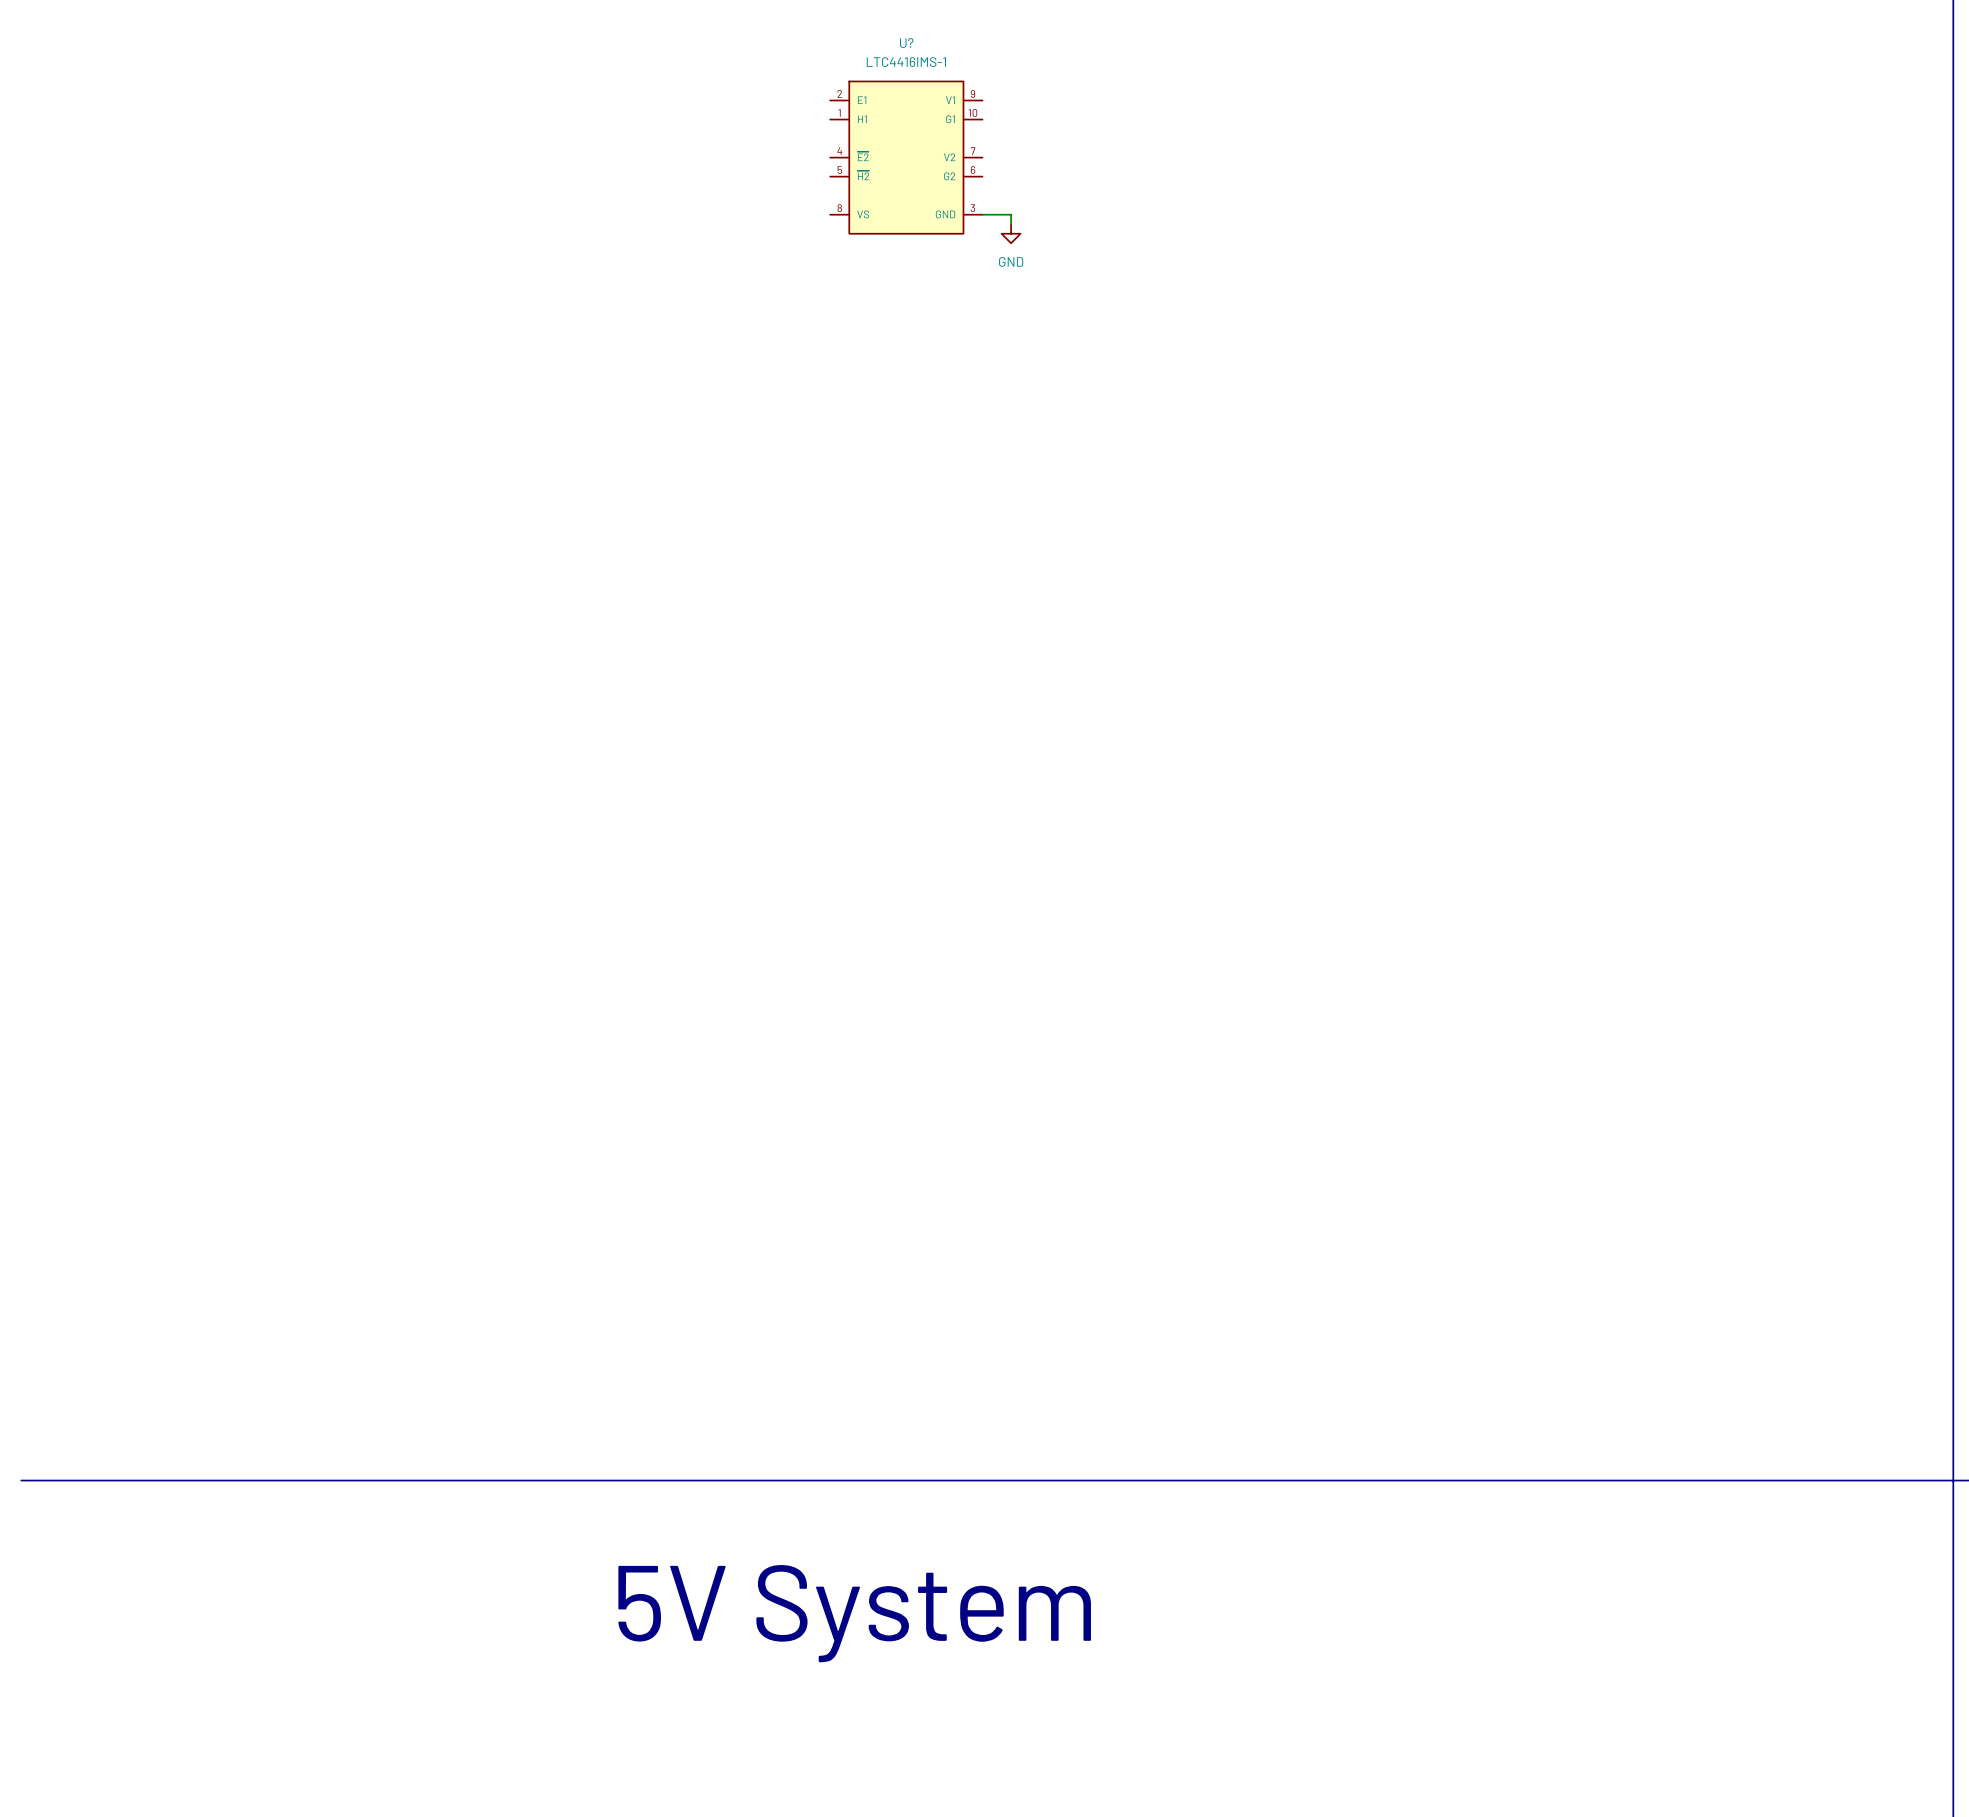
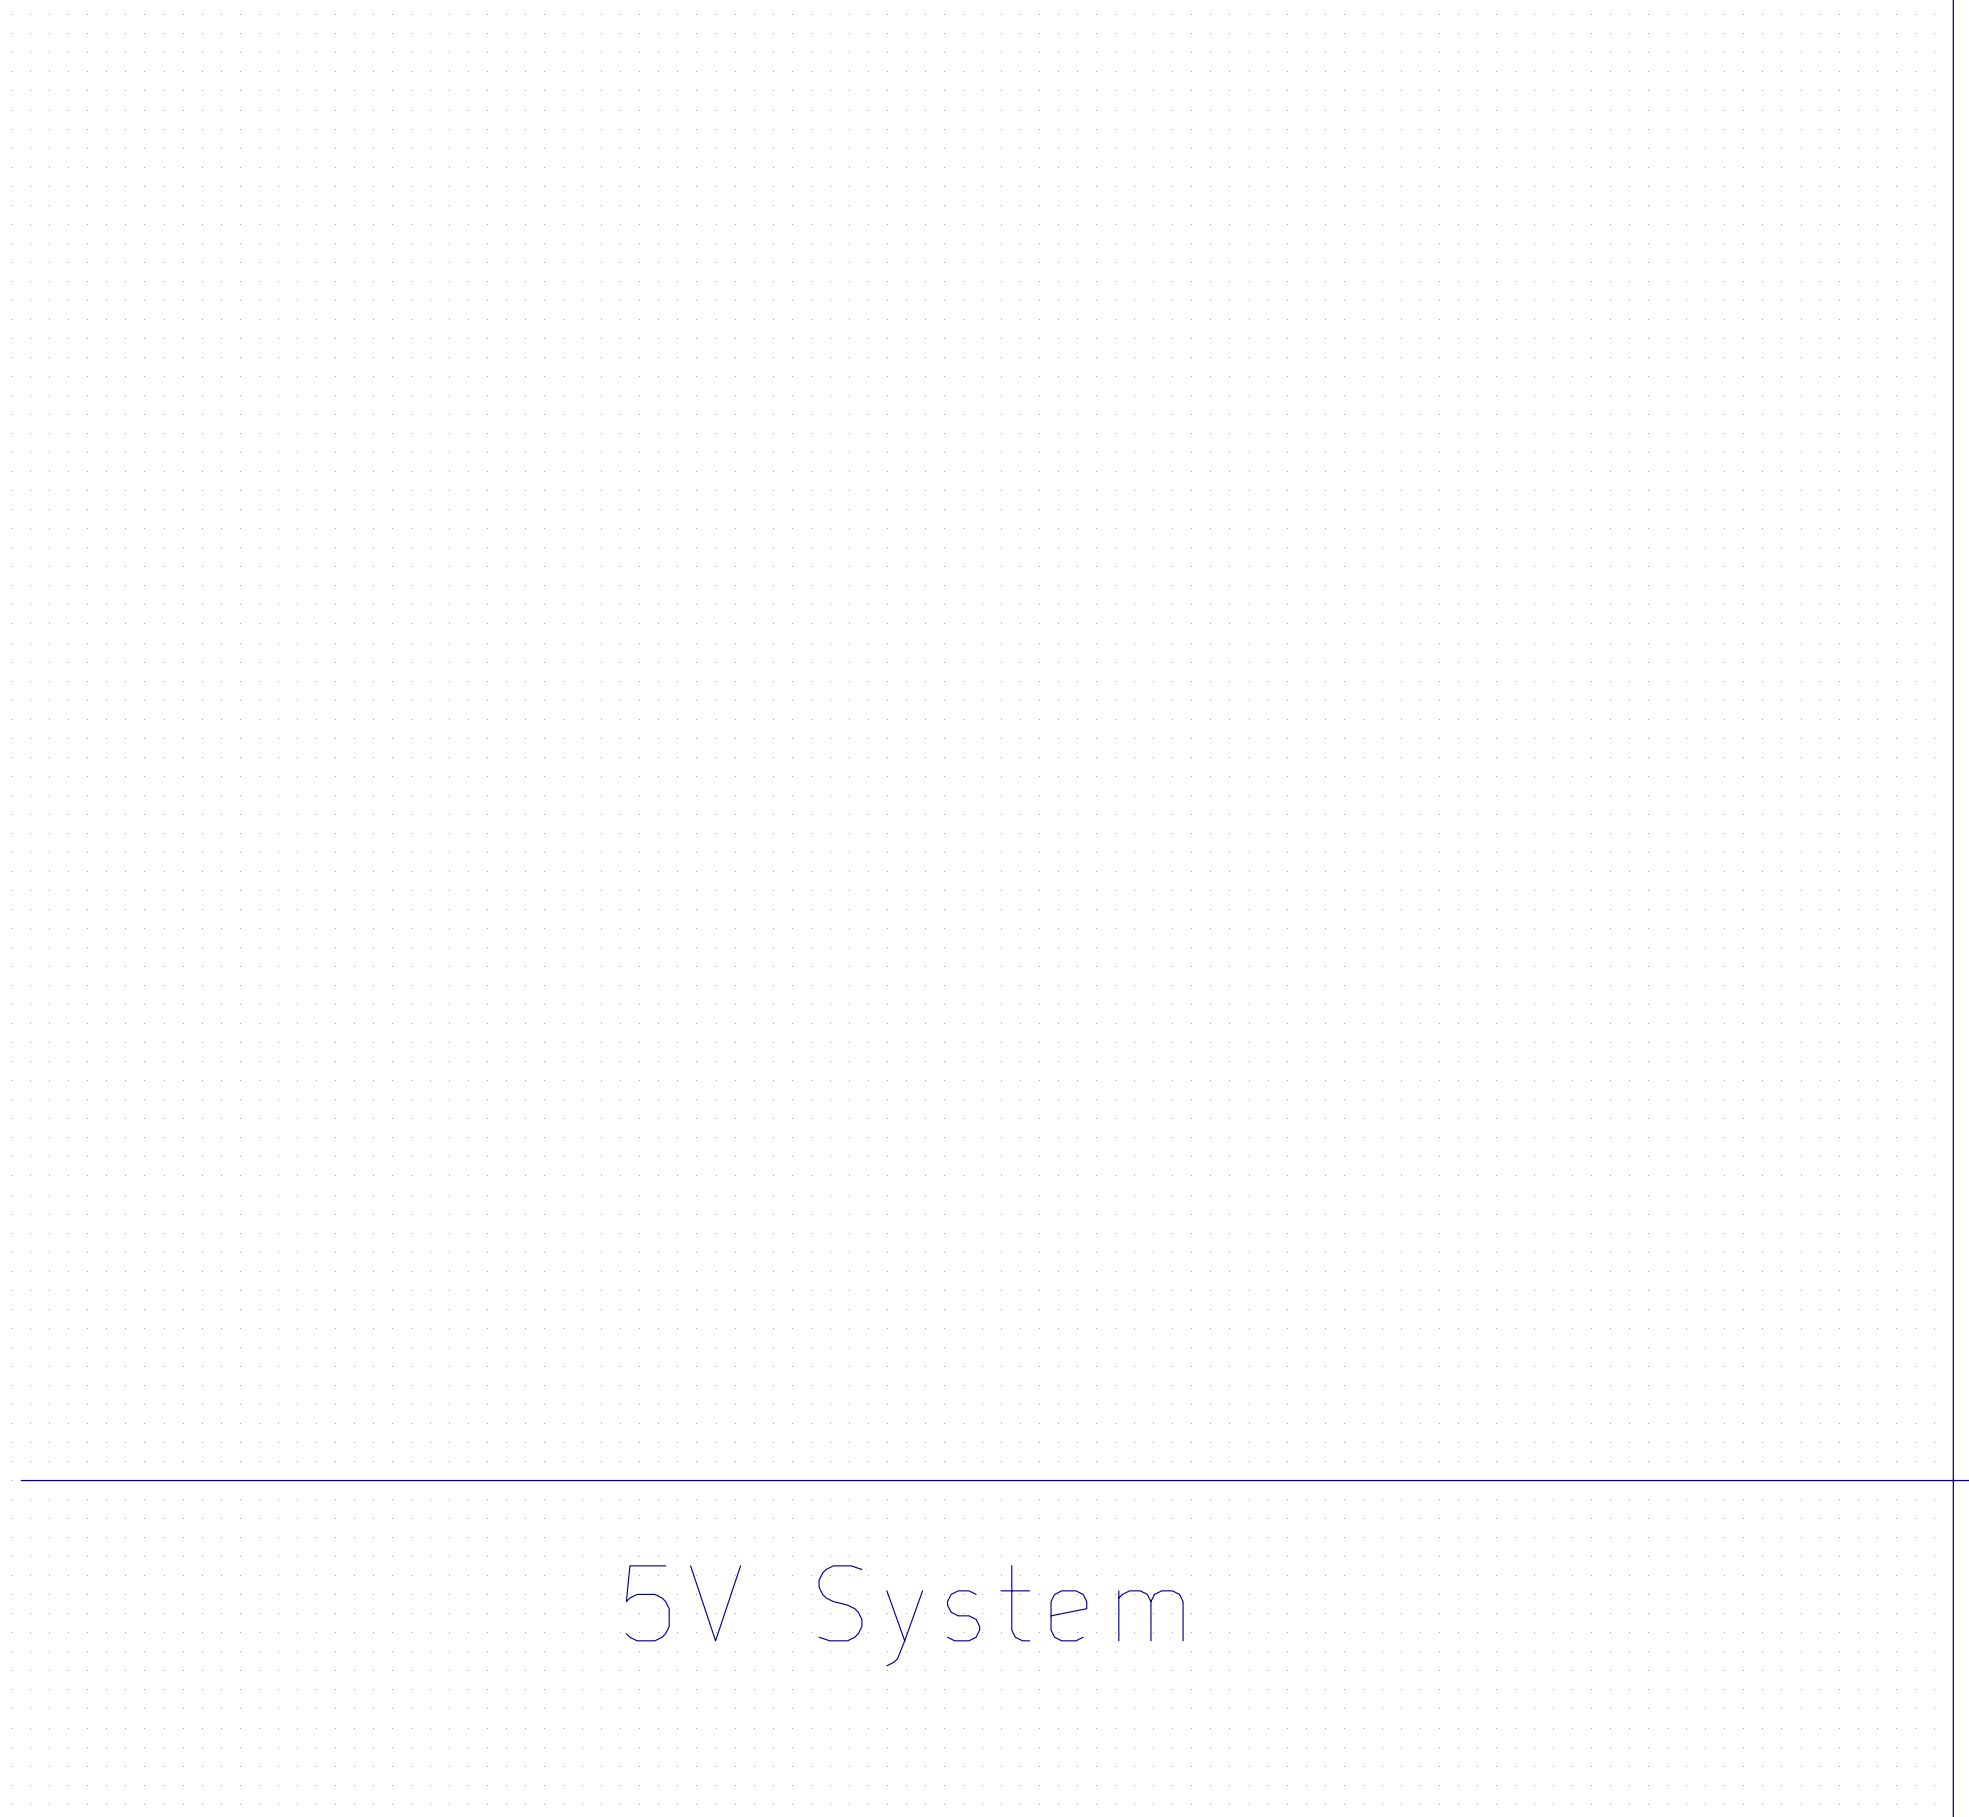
U?: LTC4416IMS-1 (906, 157) -> none
wire: (982, 214) (1011, 214) (1011, 224) -> none
power symbol: GND (1011, 233) -> none

